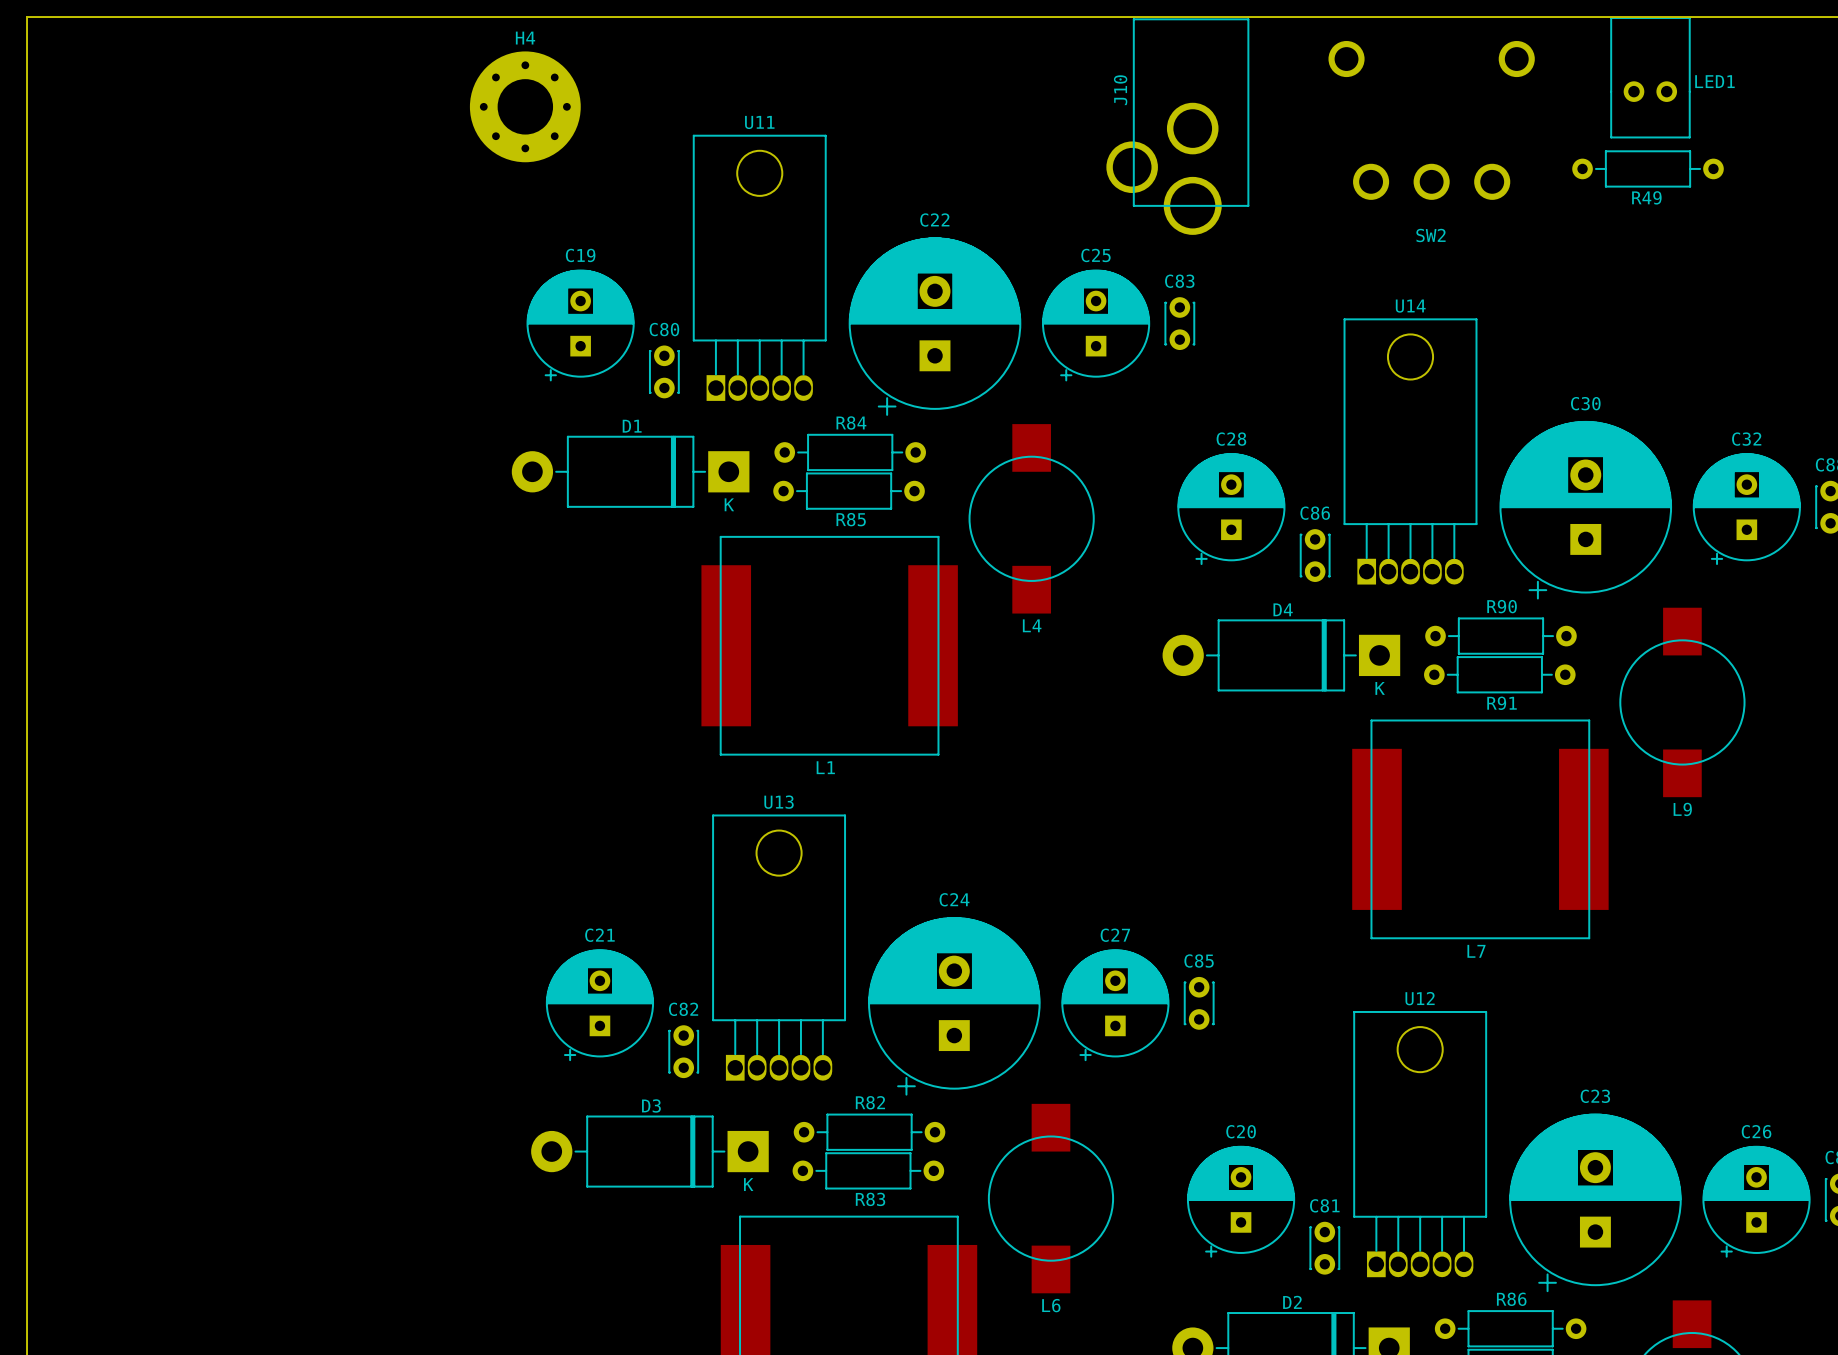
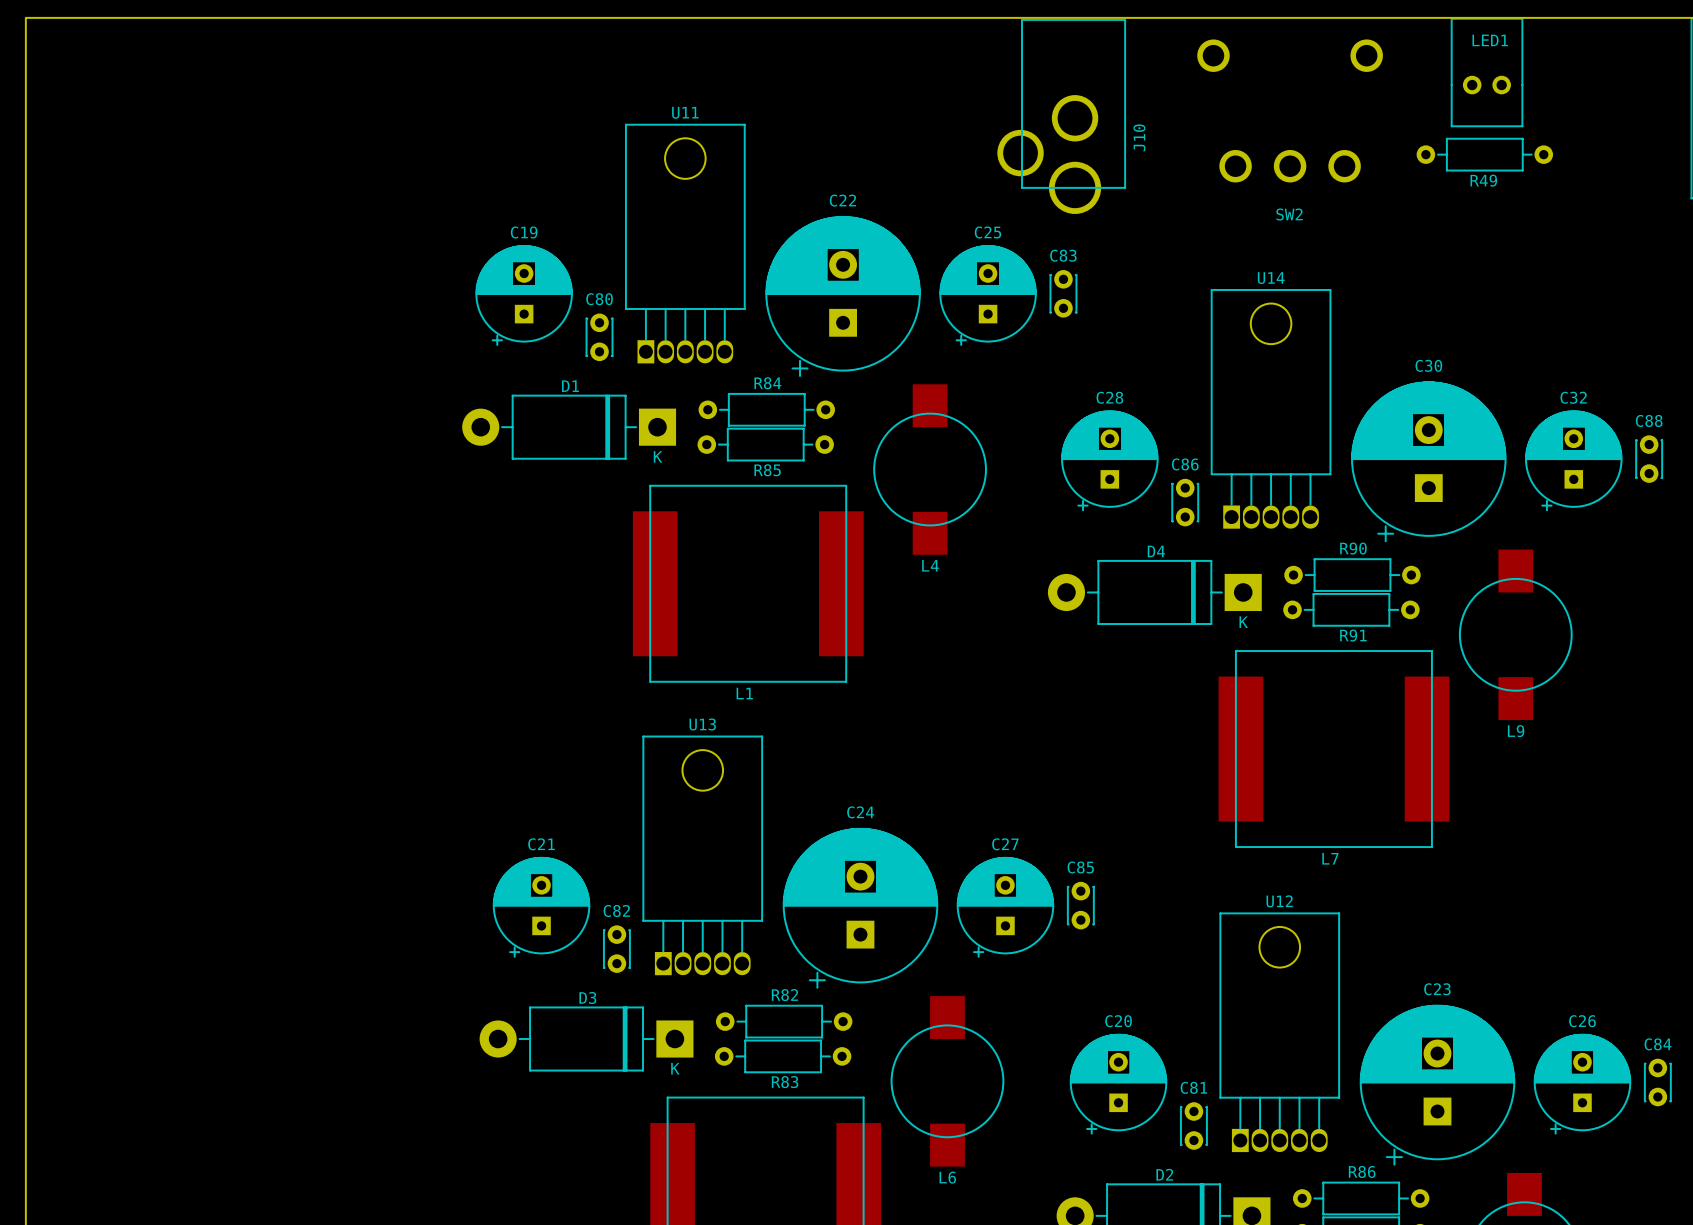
LED1 name position: LED1 (1714, 81) -> LED1 (1490, 40)
J10 name position: J10 (1120, 90) -> J10 (1139, 137)
H4: (525, 106) -> none

